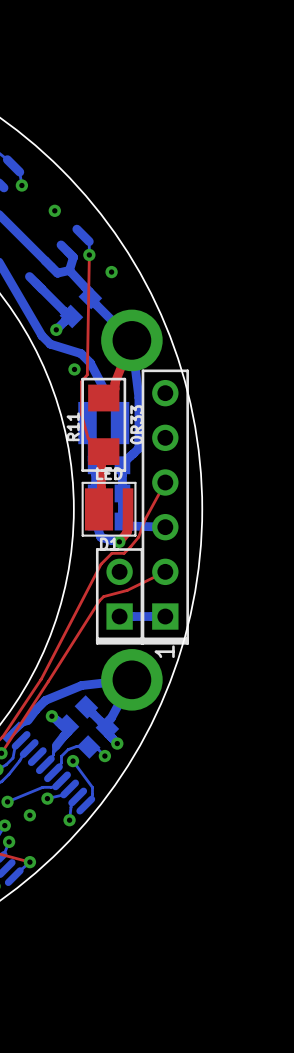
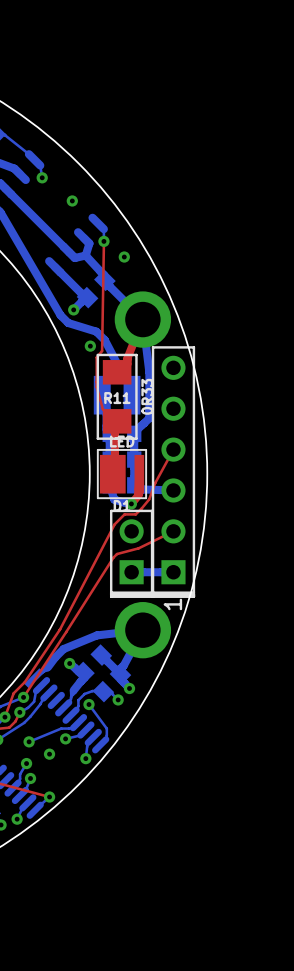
R11 name rotation: 0° (73, 426) -> 90° clockwise (117, 398)

